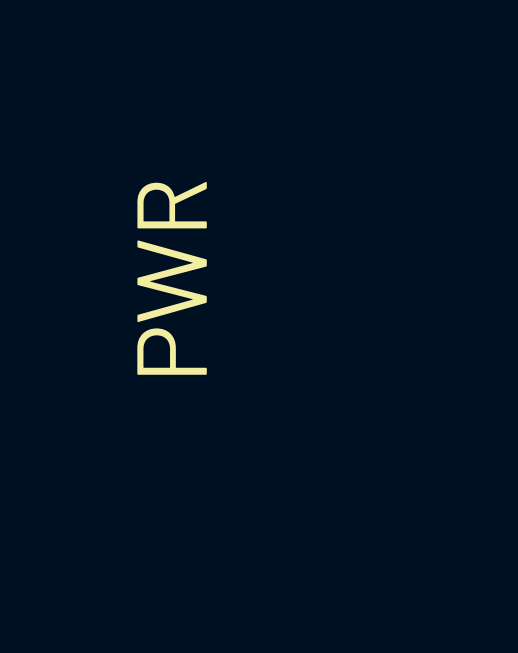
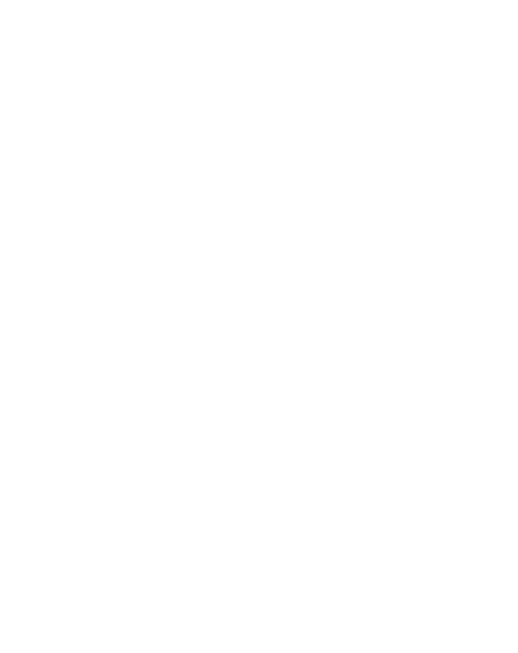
text: PWR (172, 278) -> none

